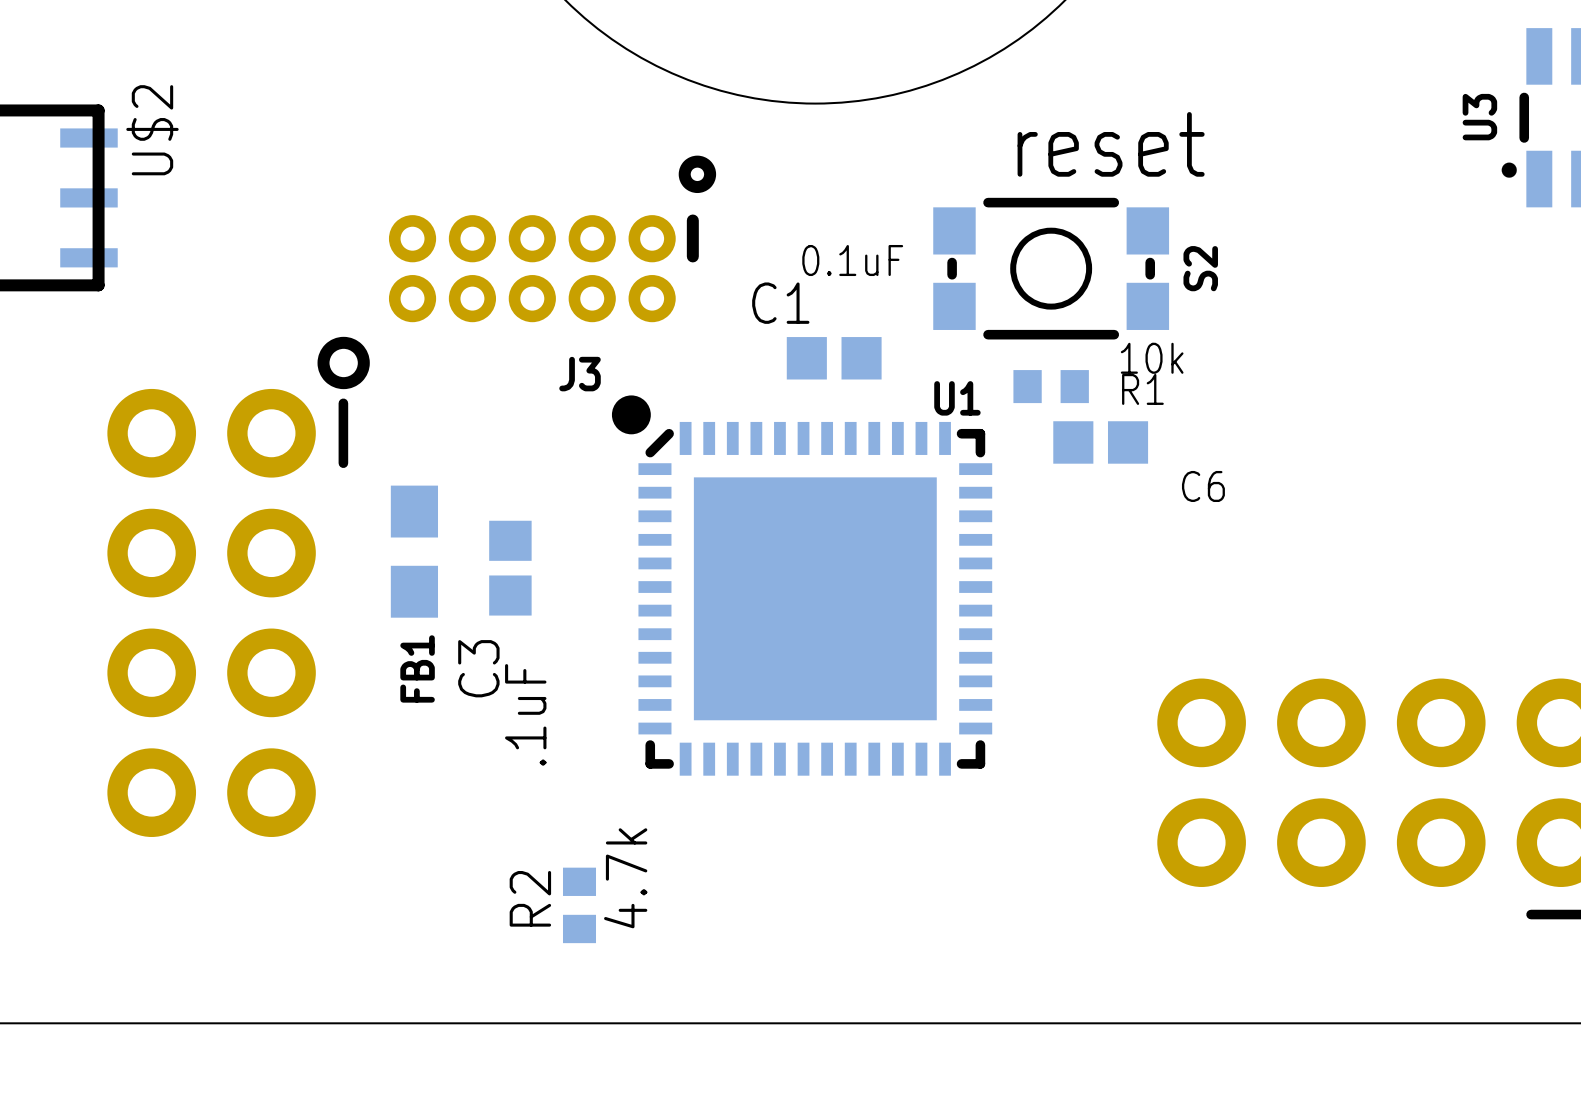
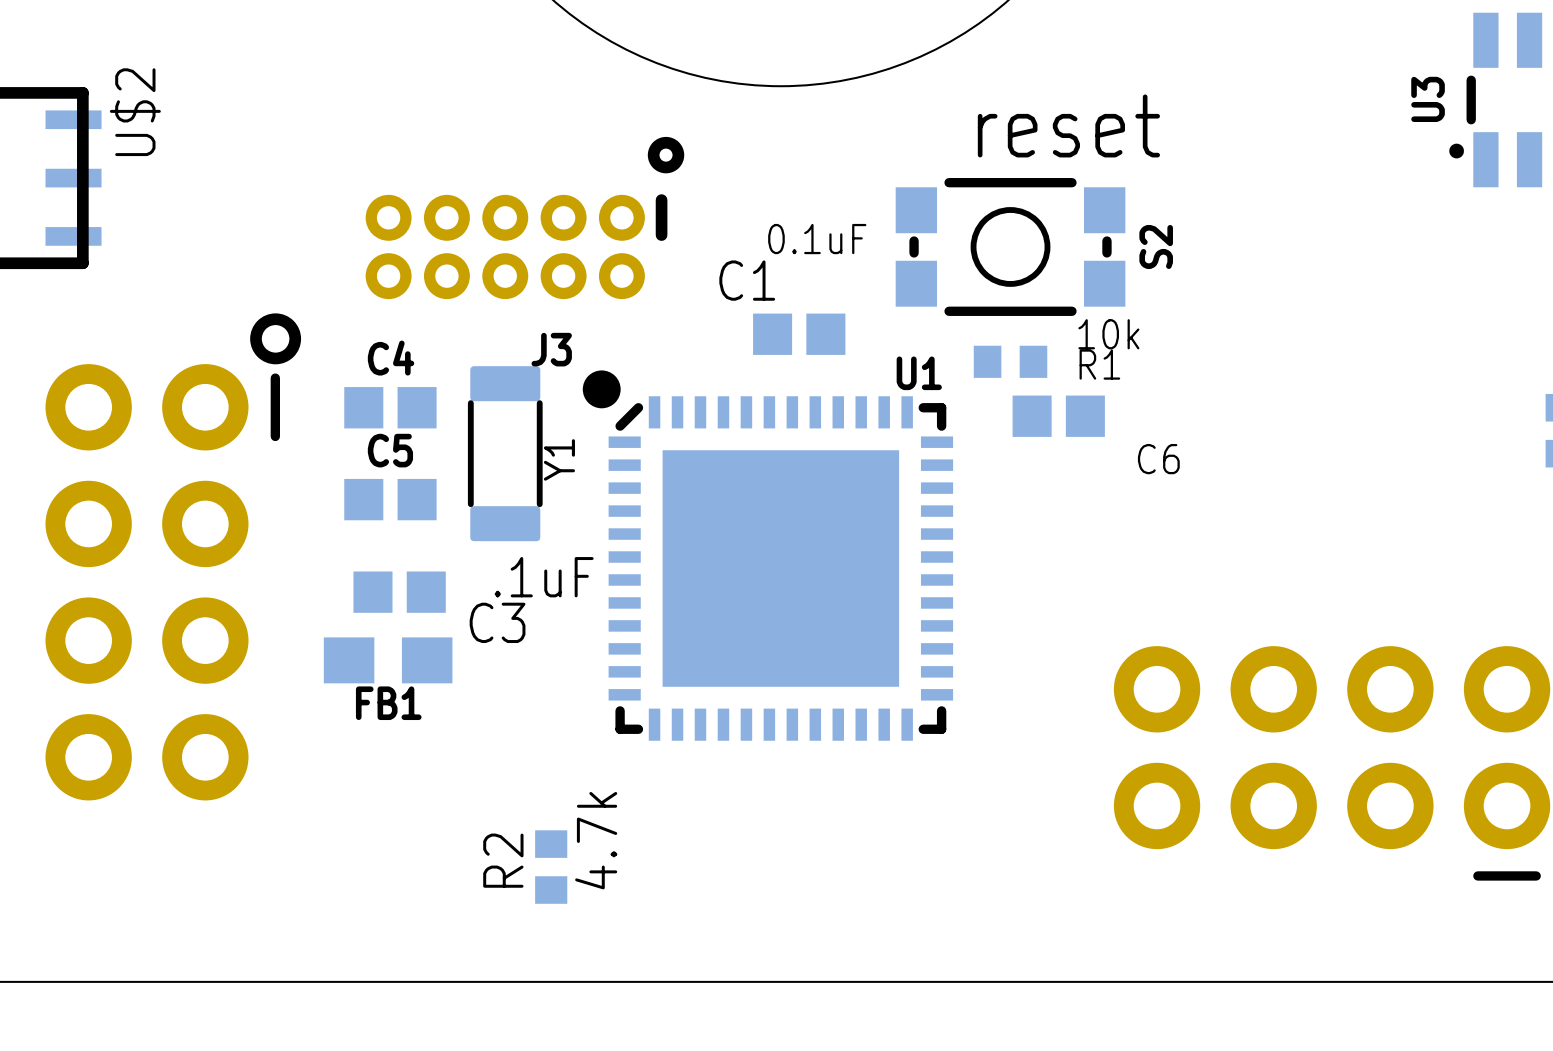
drawing position: (343, 362) -> (275, 338)
C4: none -> (390, 407)
Y1: none -> (505, 453)
C5: none -> (390, 499)
FB1 rotation: 0° (414, 551) -> 90° clockwise (388, 660)
FB1 position: (414, 551) -> (388, 660)
C3 rotation: 0° (510, 568) -> 90° clockwise (399, 592)
C3 position: (510, 568) -> (399, 592)
part position: (227, 612) -> (162, 582)
C3 name position: C3 (478, 668) -> C3 (497, 622)
C3 value position: .1uF (525, 714) -> .1uF (544, 577)

